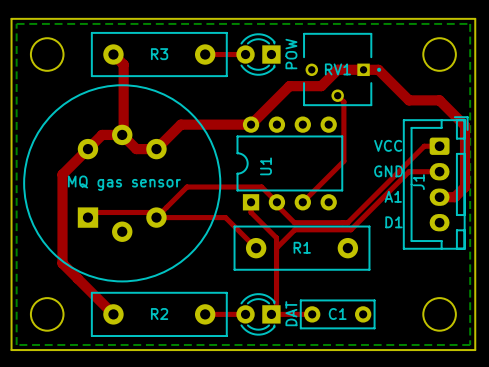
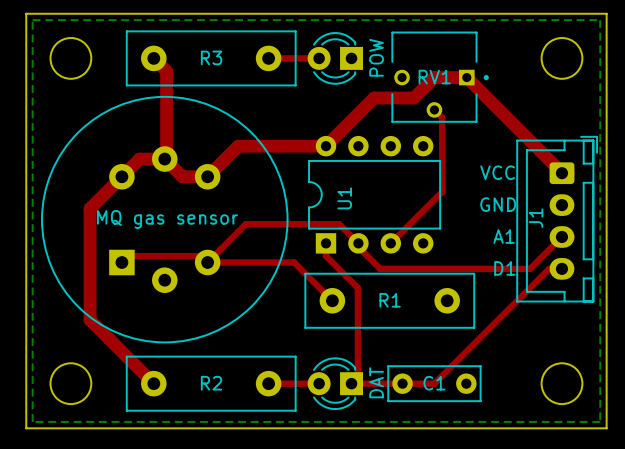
top track: (363, 69) (378, 69) (409, 100) (439, 100) (465, 125) (465, 187) (454, 197) (444, 197) -> (466, 77) (562, 173) (568, 173)
top track: (439, 146) (424, 146) (347, 222) -> (561, 236) (530, 268) (447, 268)
top track: (439, 171) (409, 171) (350, 229) (294, 229) (276, 248) -> none
top track: none -> (568, 268) (549, 268) (434, 383) (402, 383)

